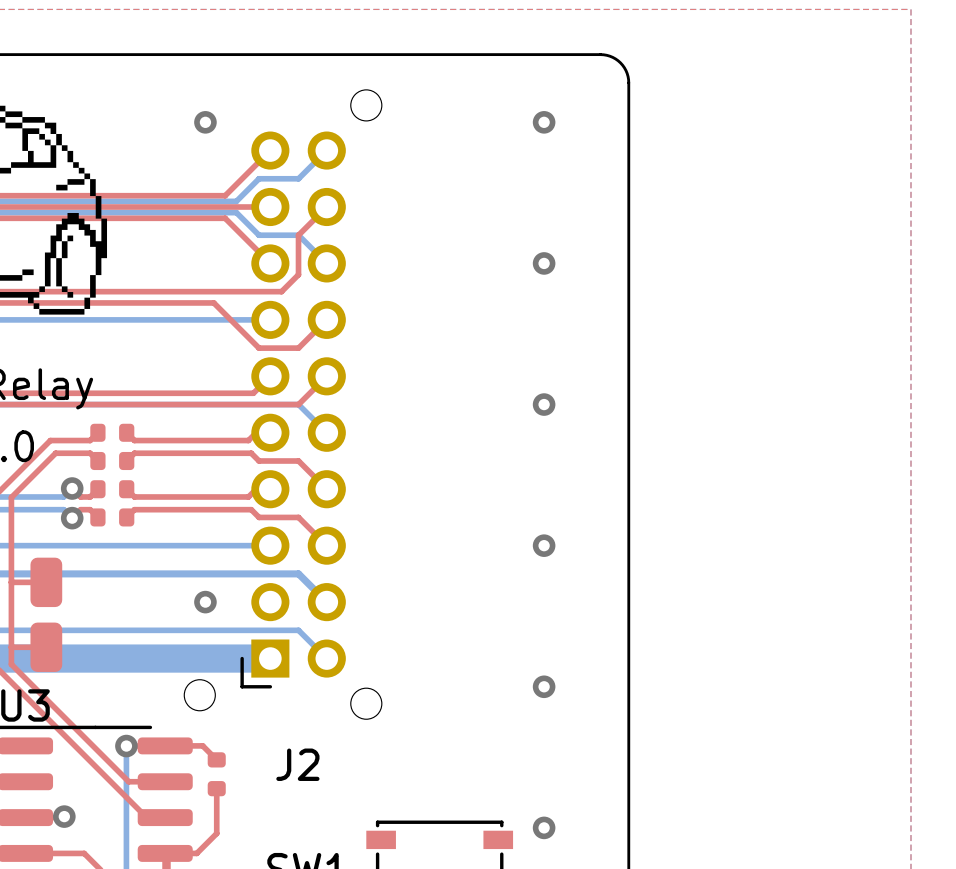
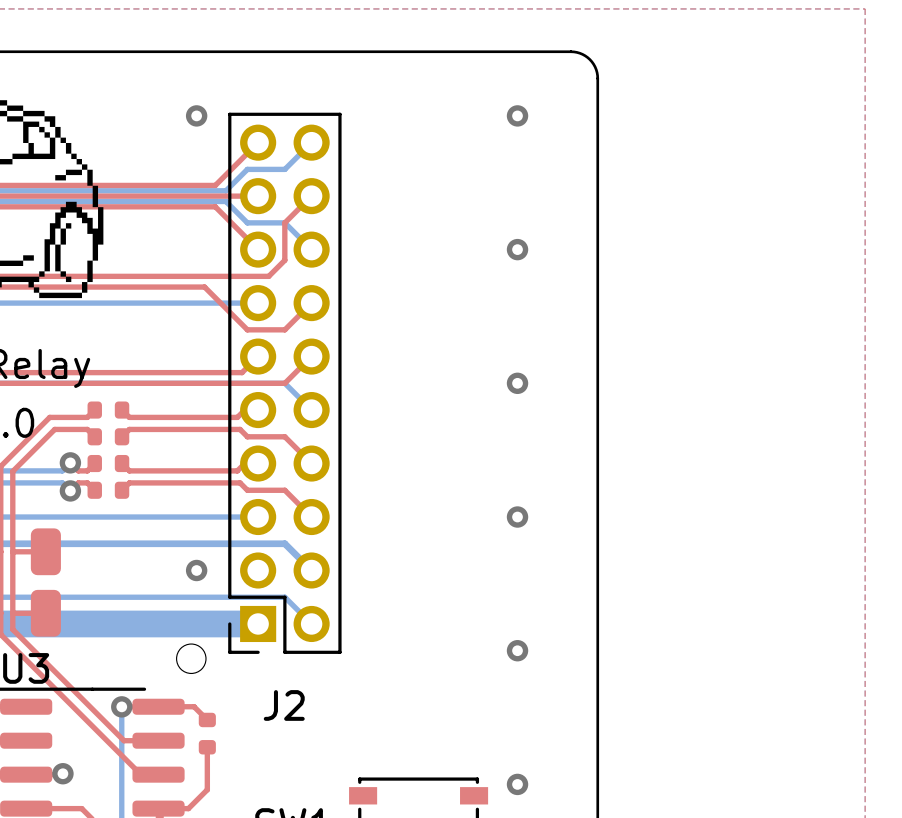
J2 footprint: [240, 89, 382, 720] -> [228, 112, 342, 654]

